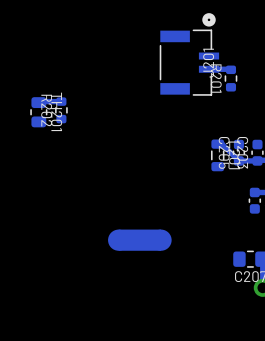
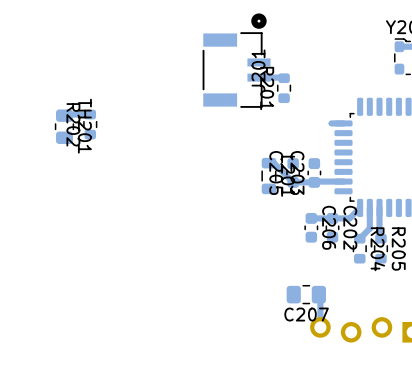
part: (139, 240) -> none

